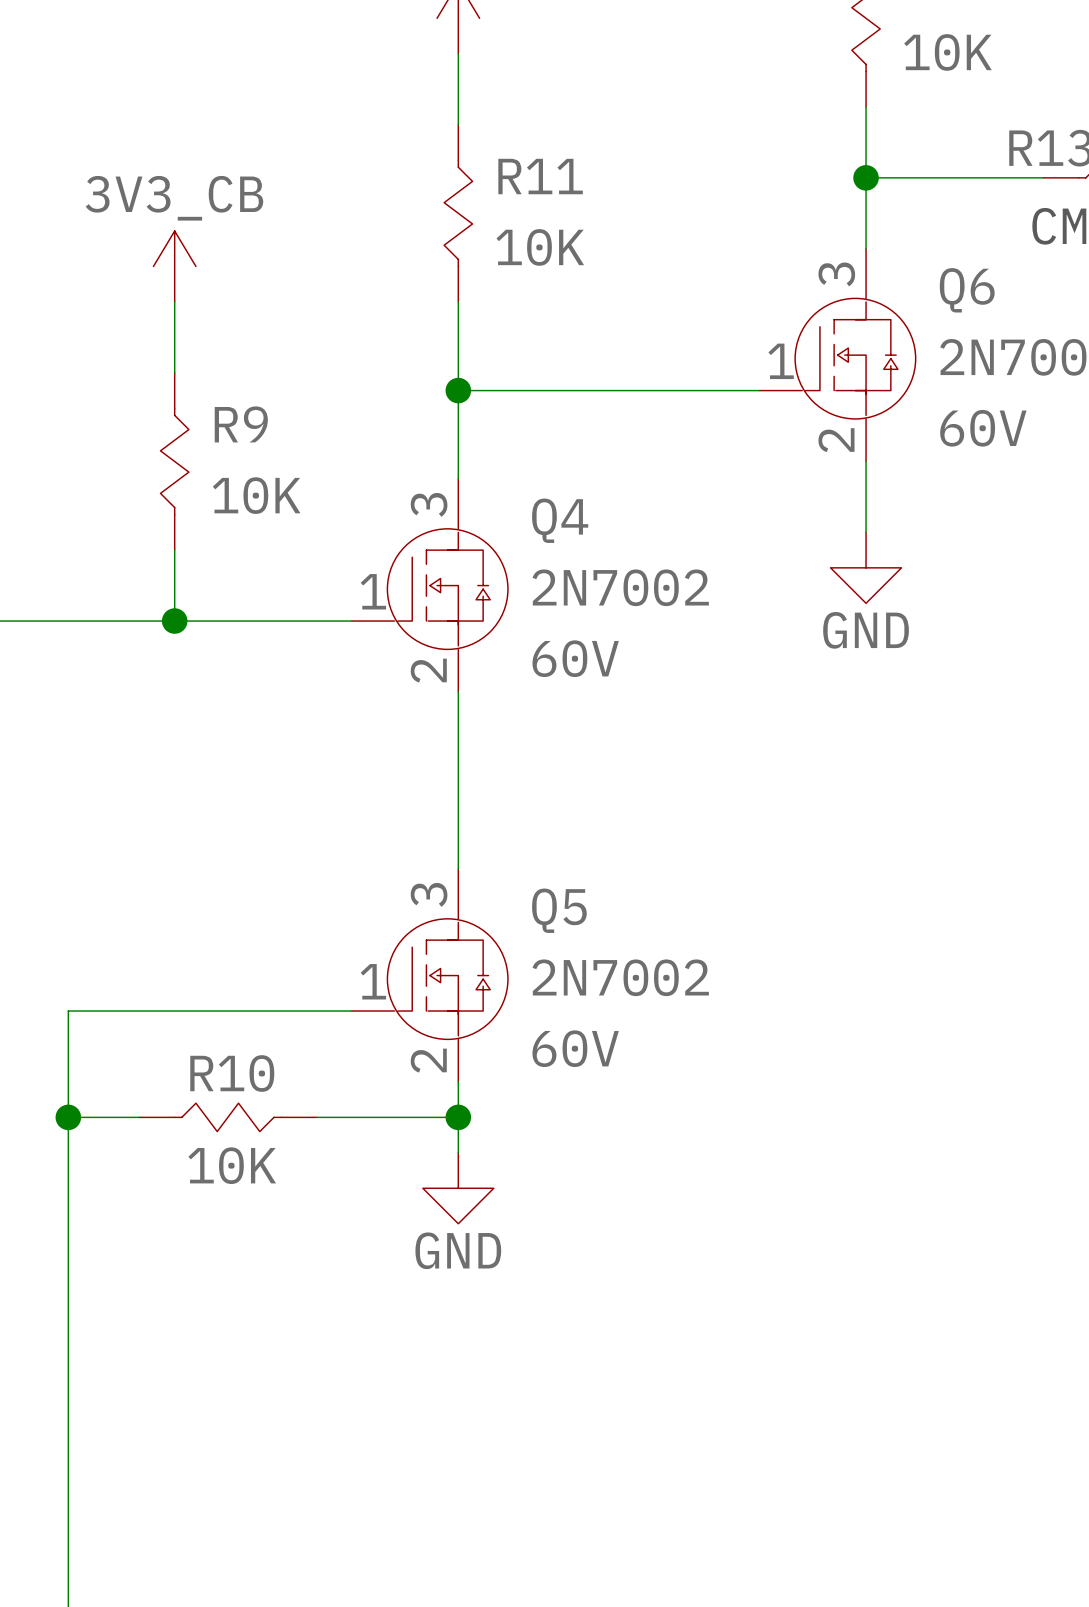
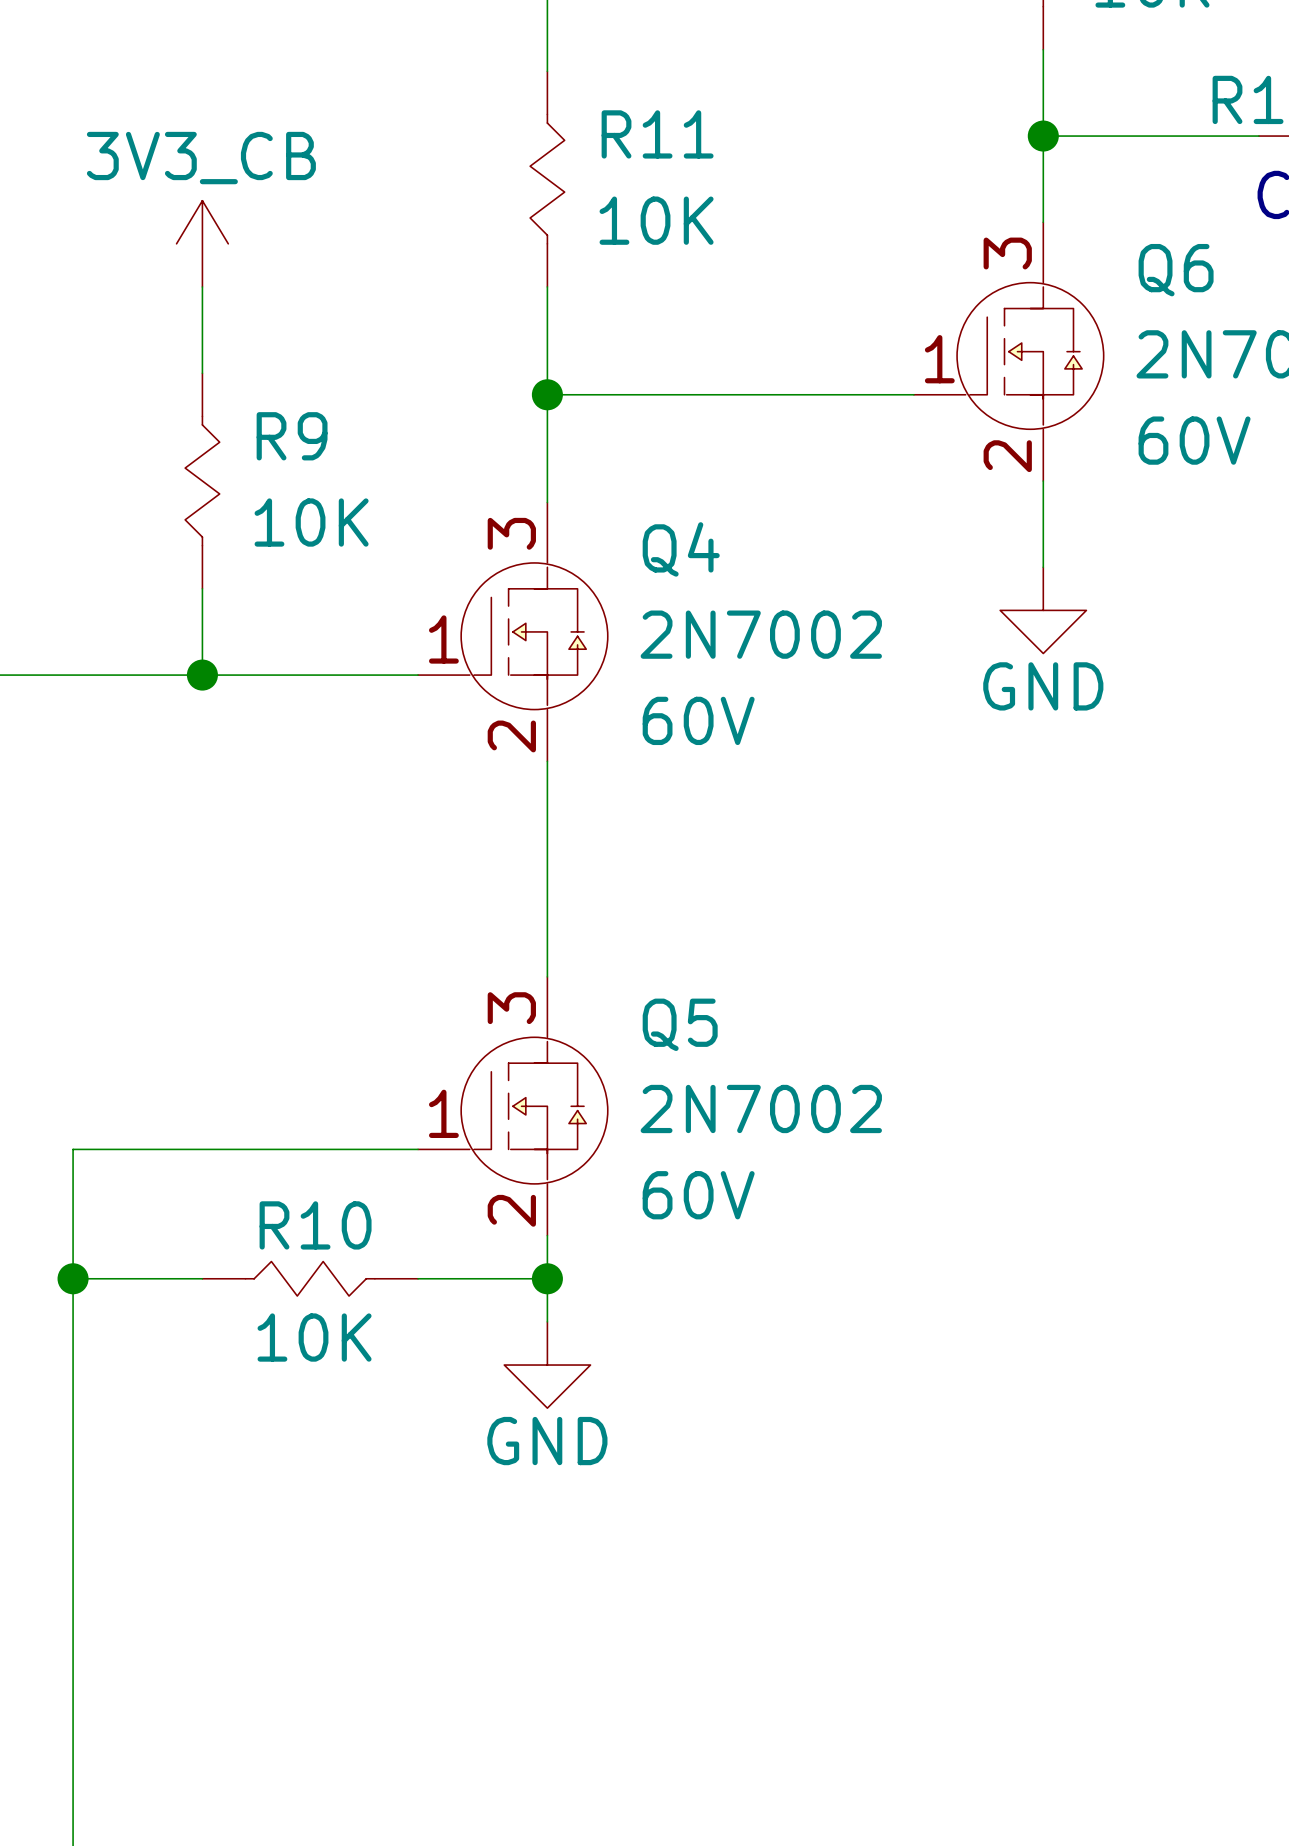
R10 position: (227, 1117) -> (310, 1278)

